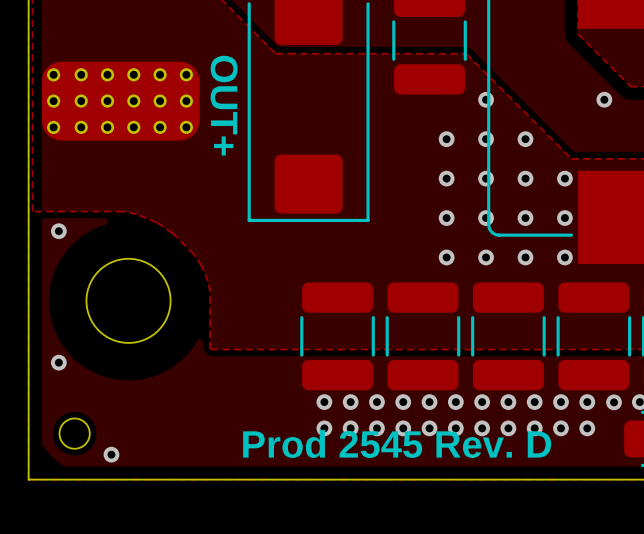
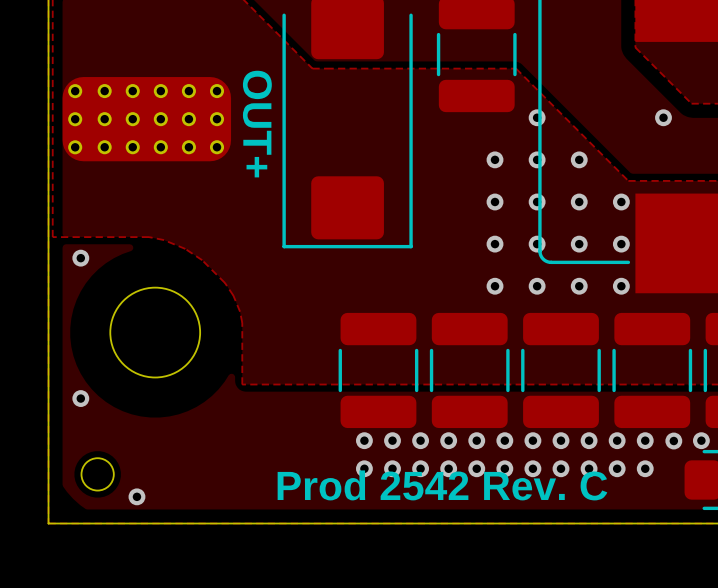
text: Prod 2545 Rev. D (397, 443) -> Prod 2542 Rev. C (442, 485)

